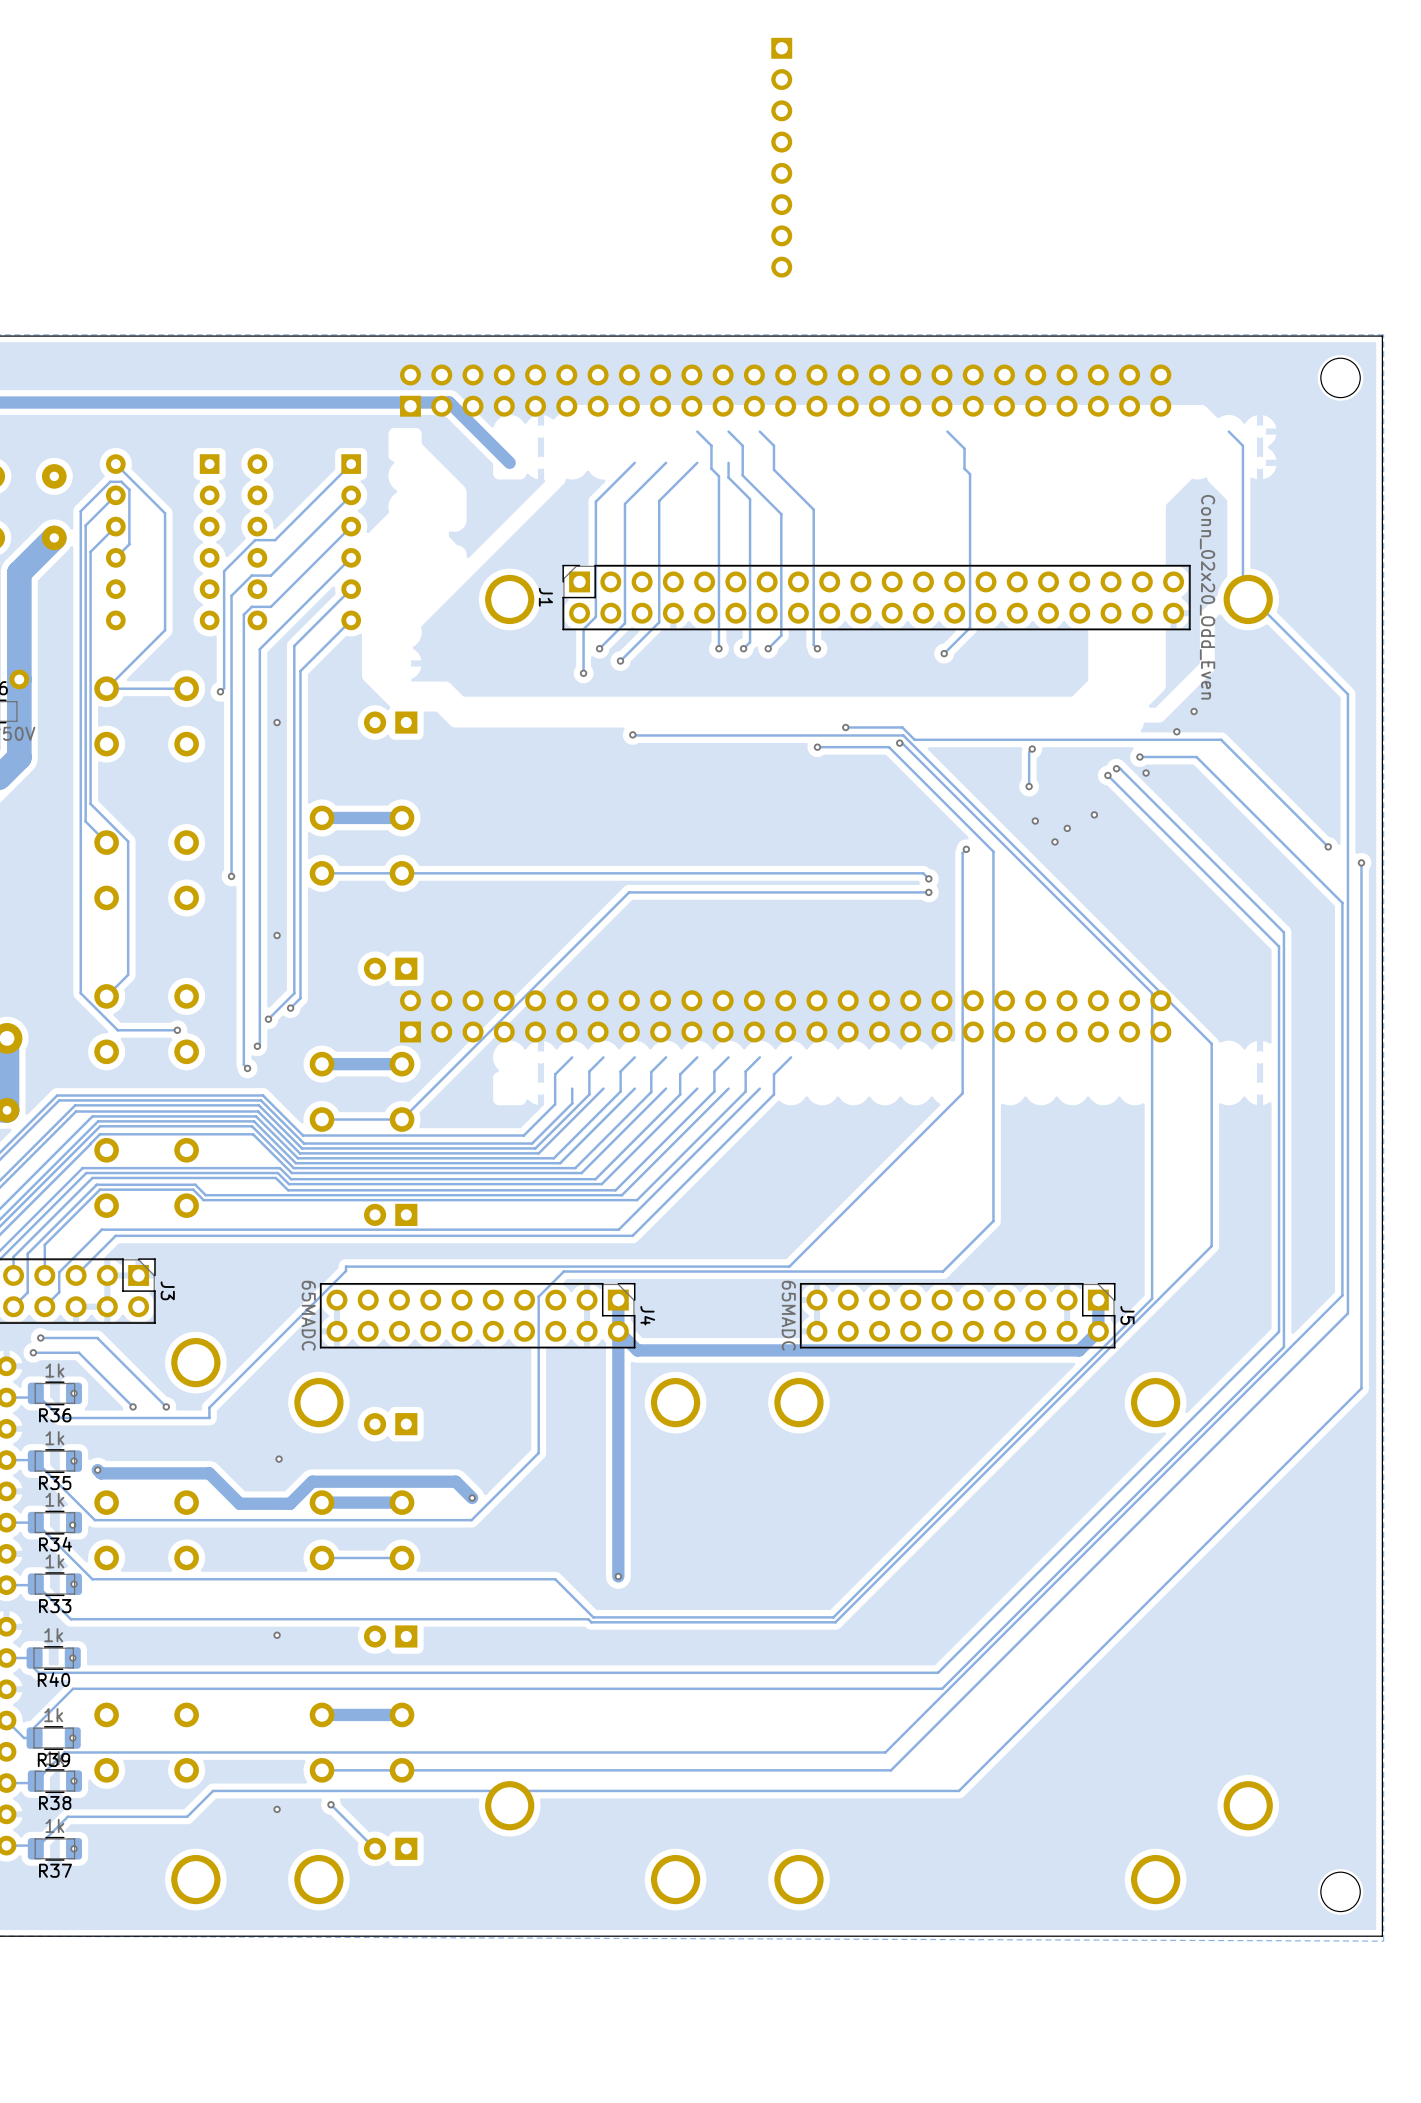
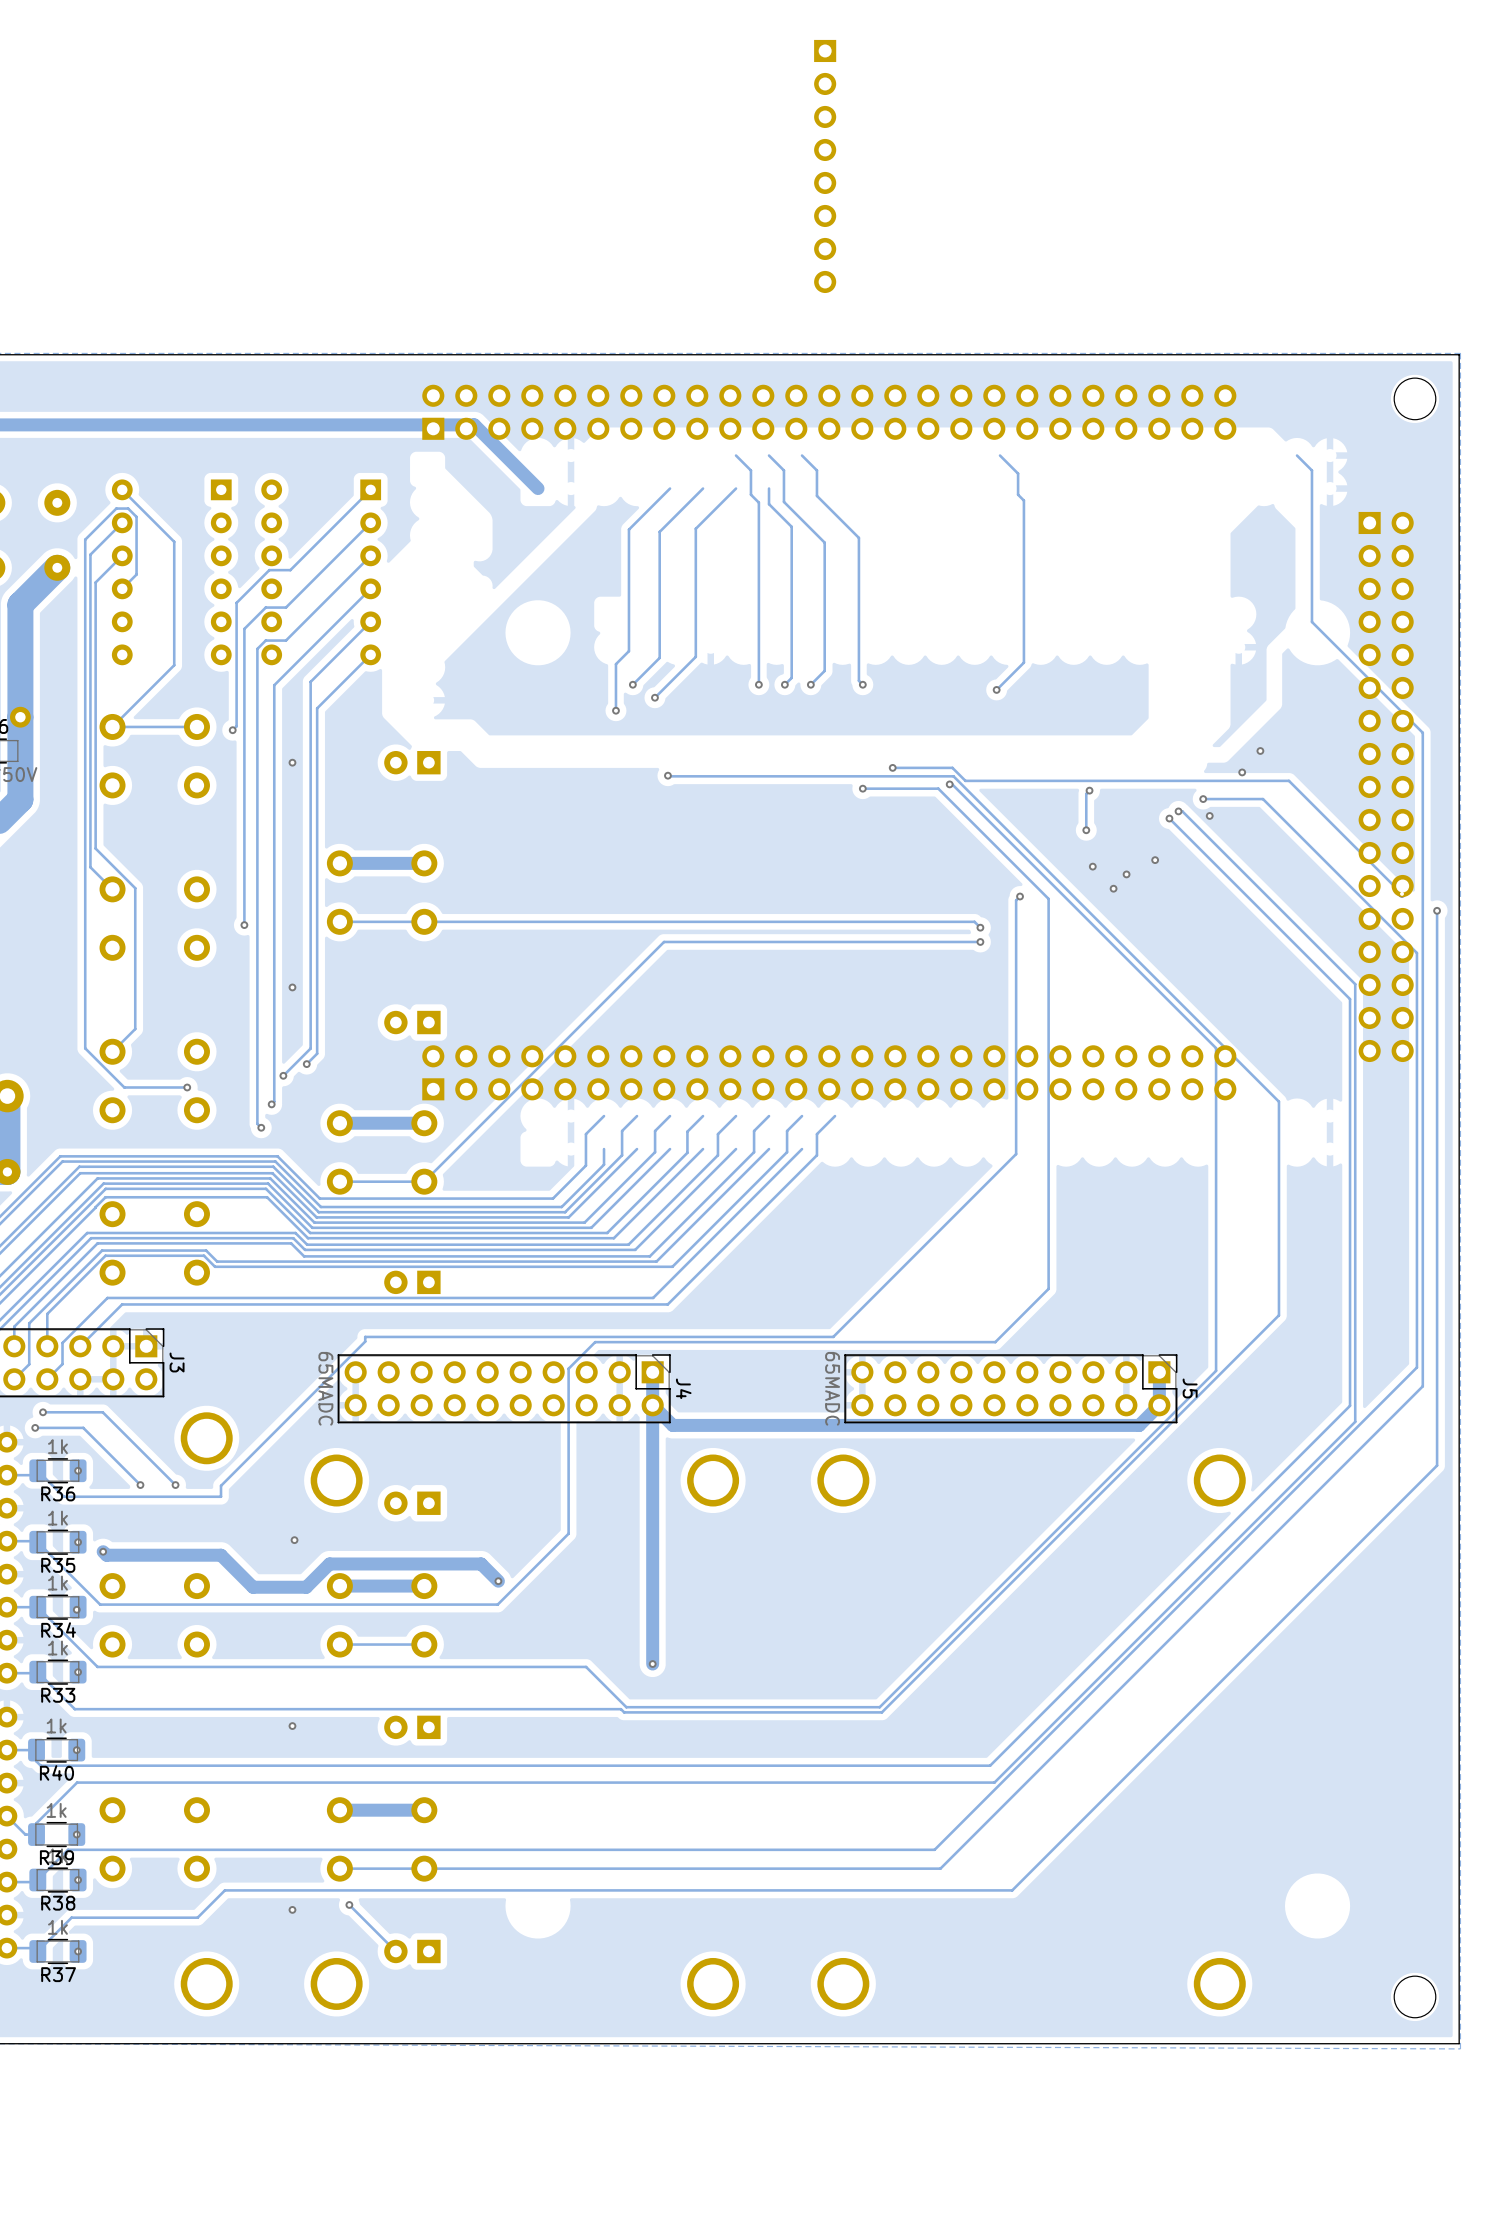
part: none -> (1386, 786)
J1: Conn_02x20_Odd_Even (878, 1197) -> none

